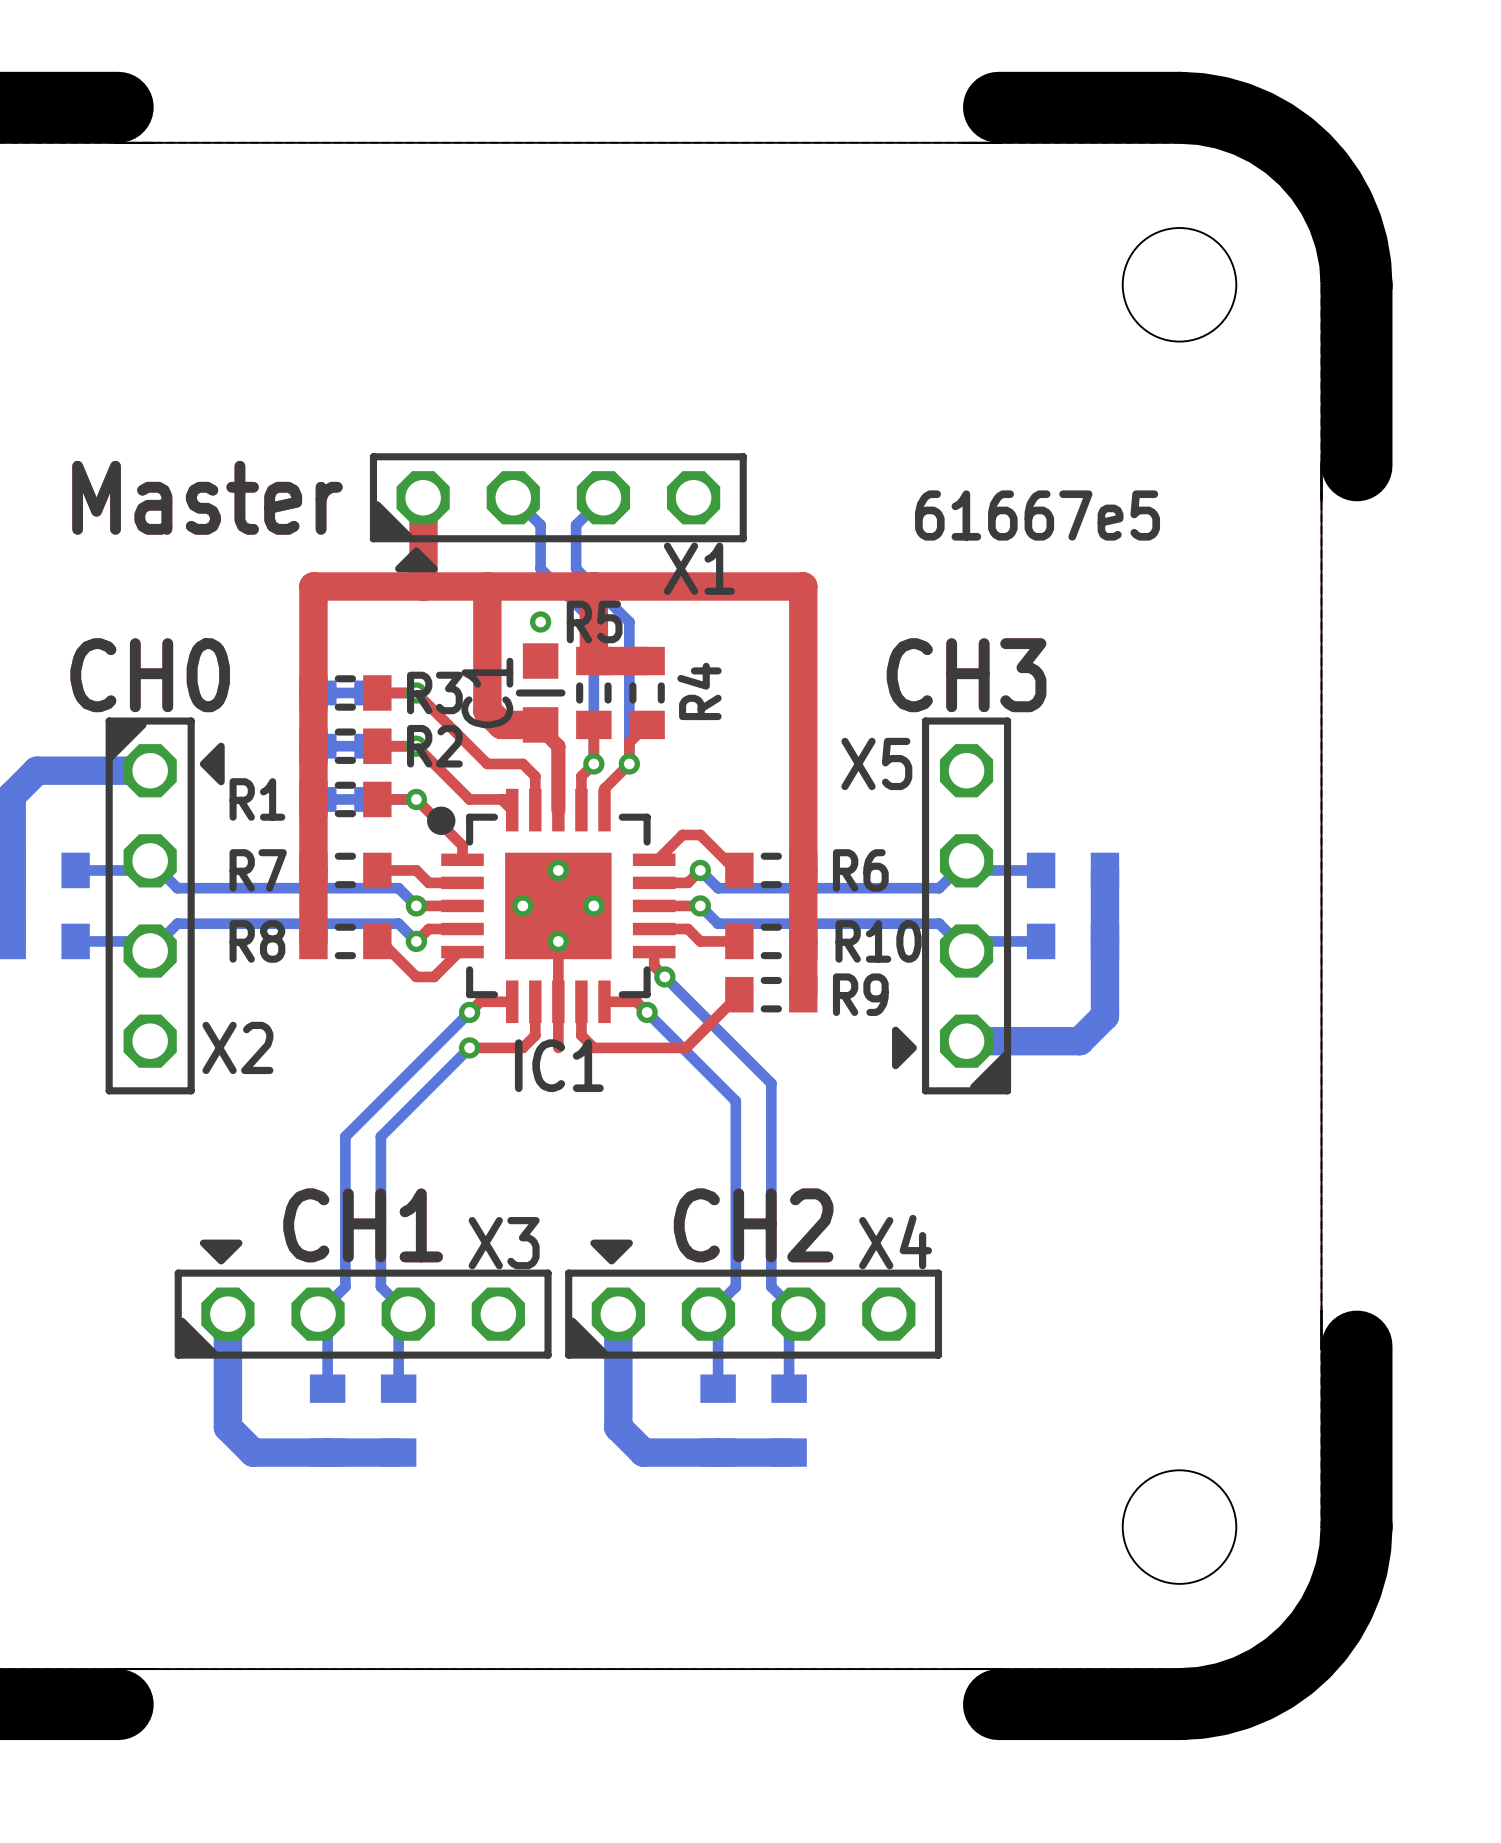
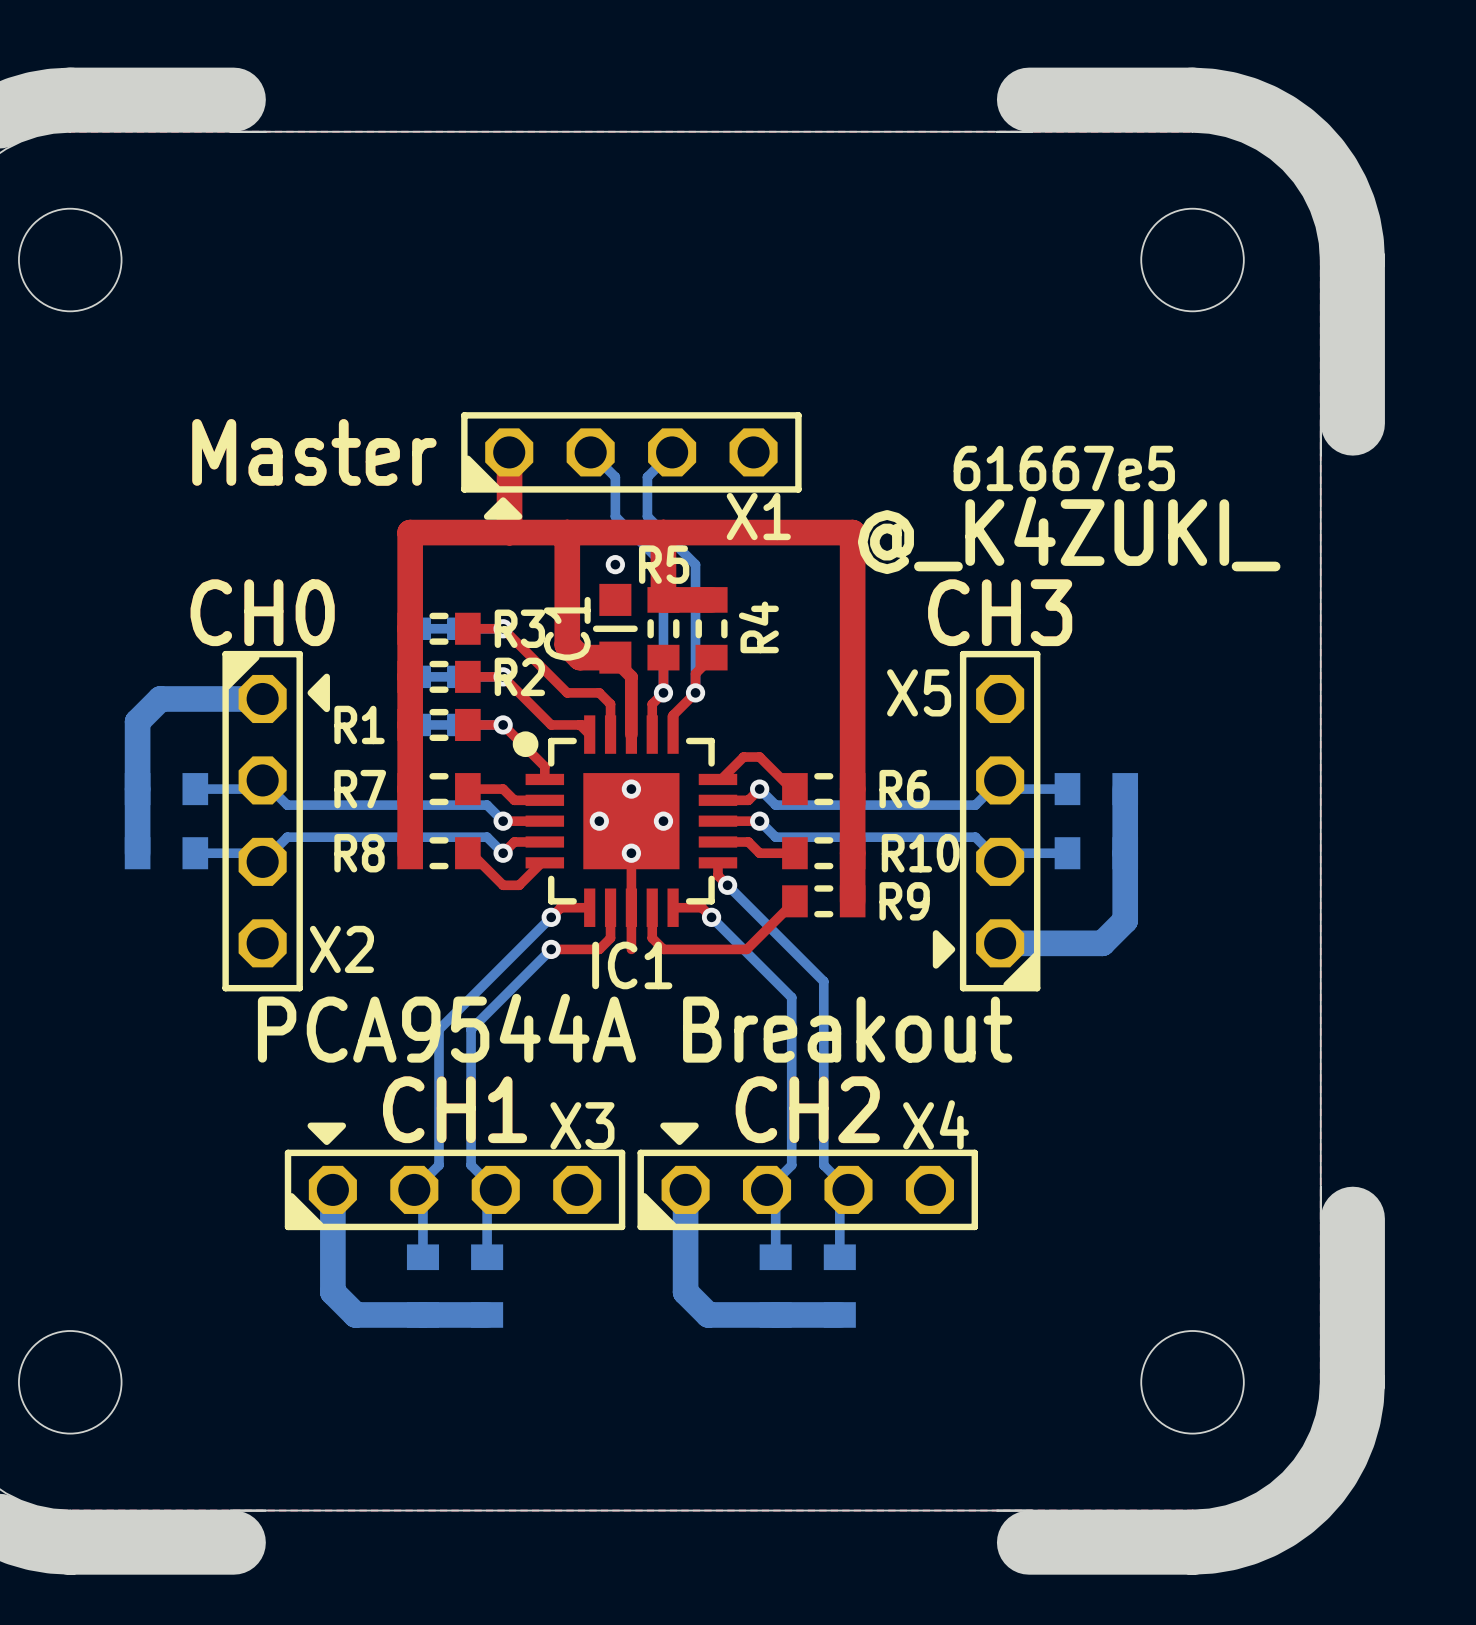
text: none -> @_K4ZUKI_ (1069, 535)
text: none -> PCA9544A Breakout (635, 1028)

